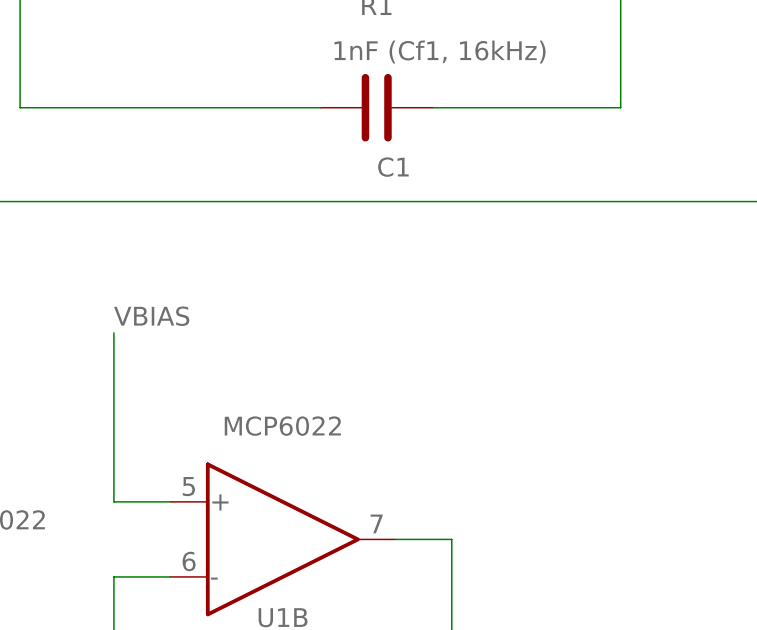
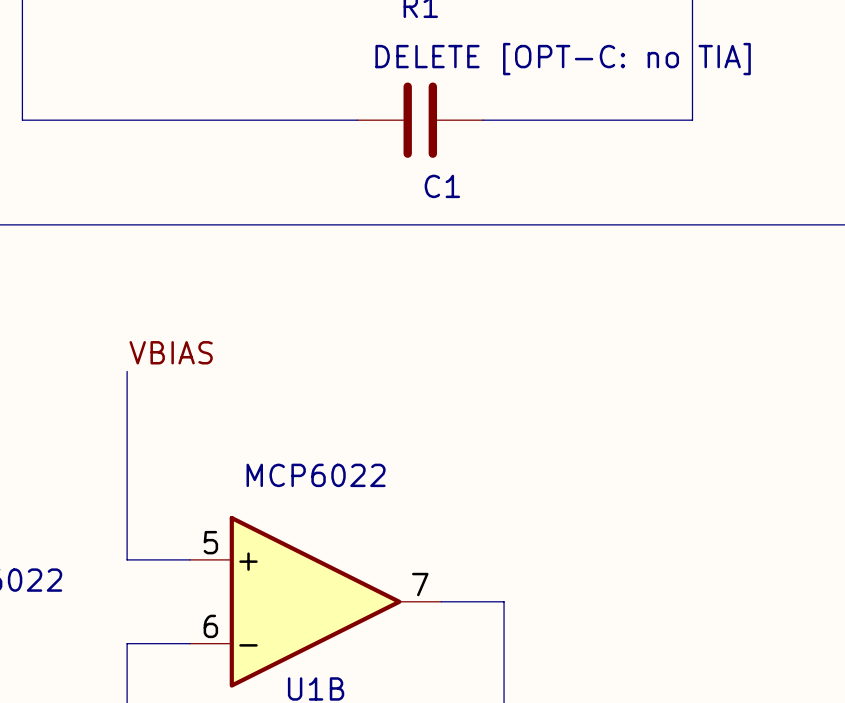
C1 value: 1nF (Cf1, 16kHz) (440, 52) -> DELETE [OPT-C: no TIA] (563, 59)

